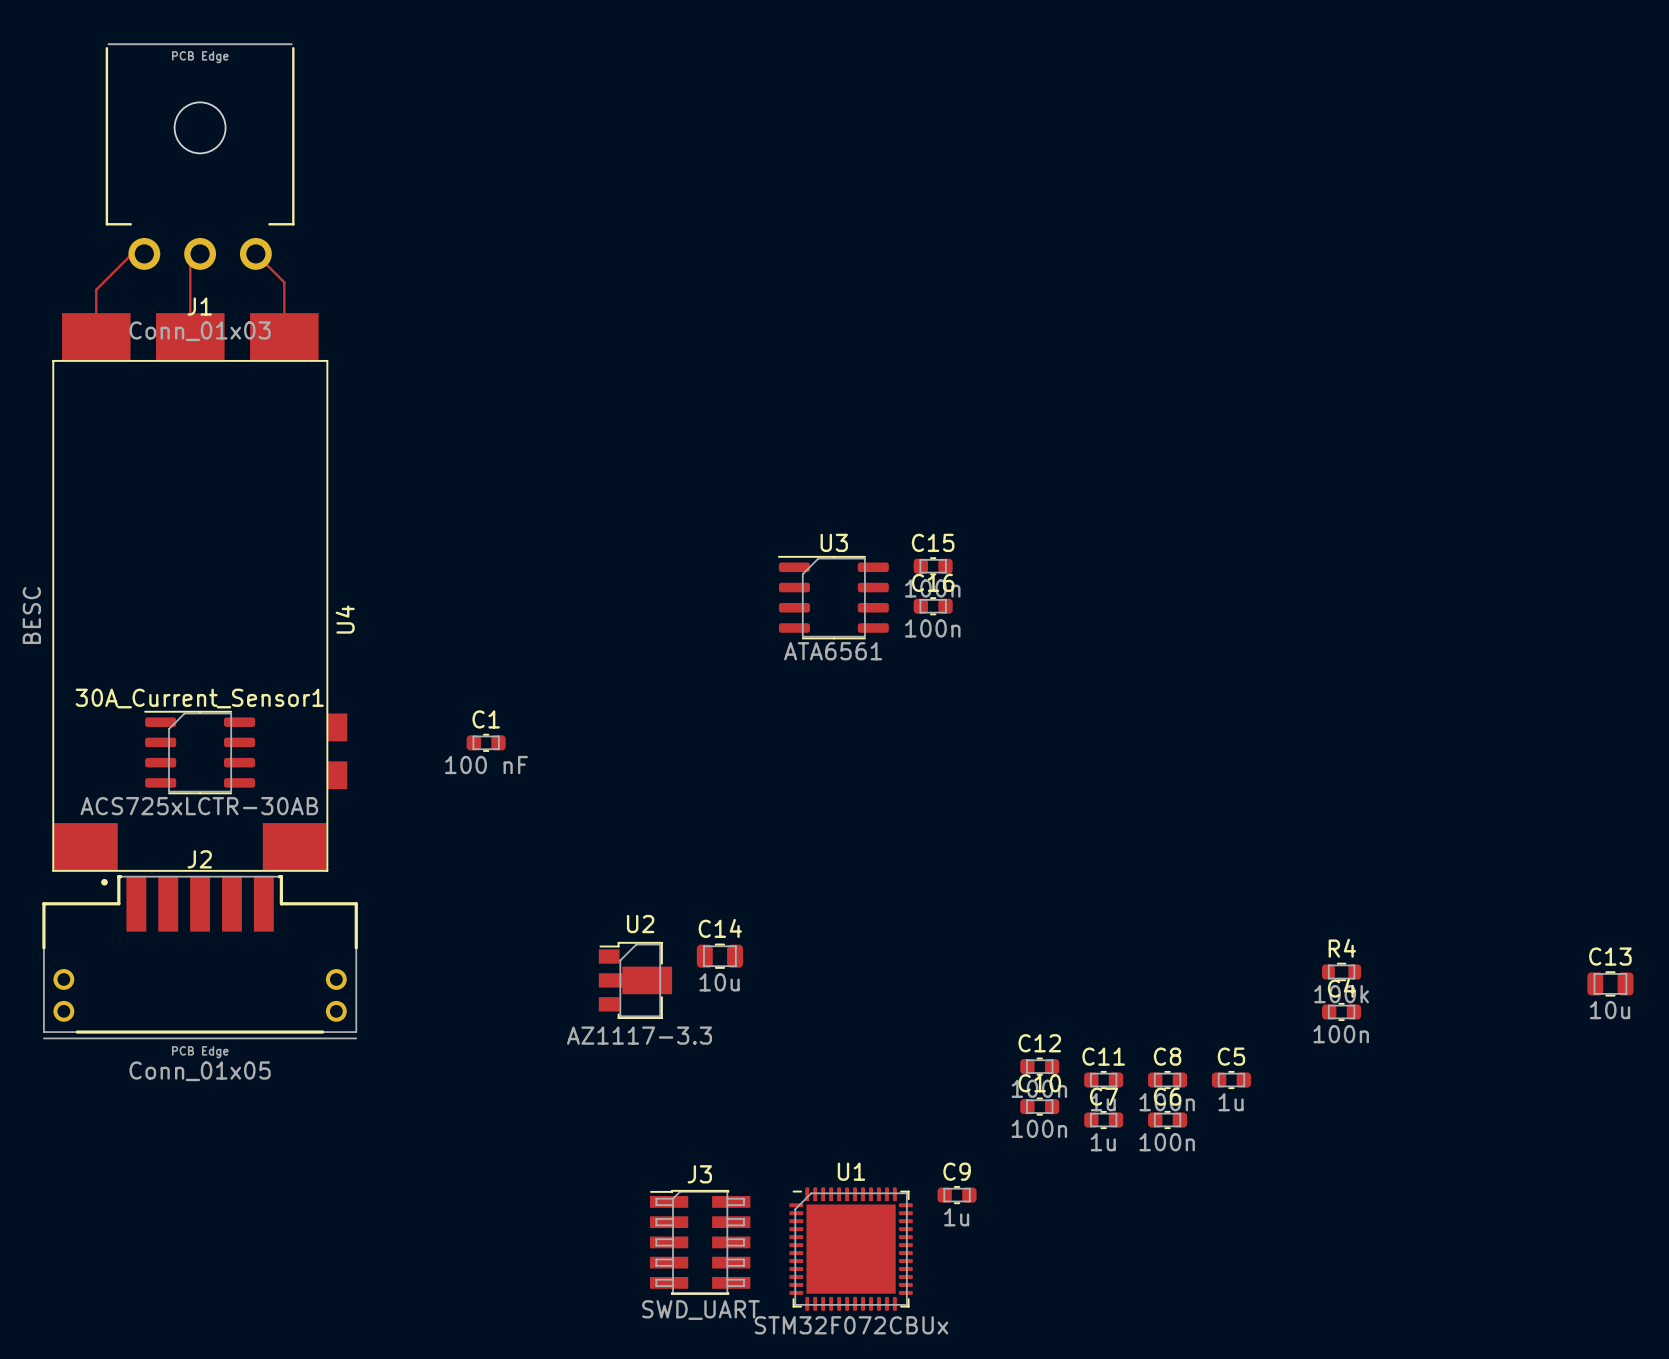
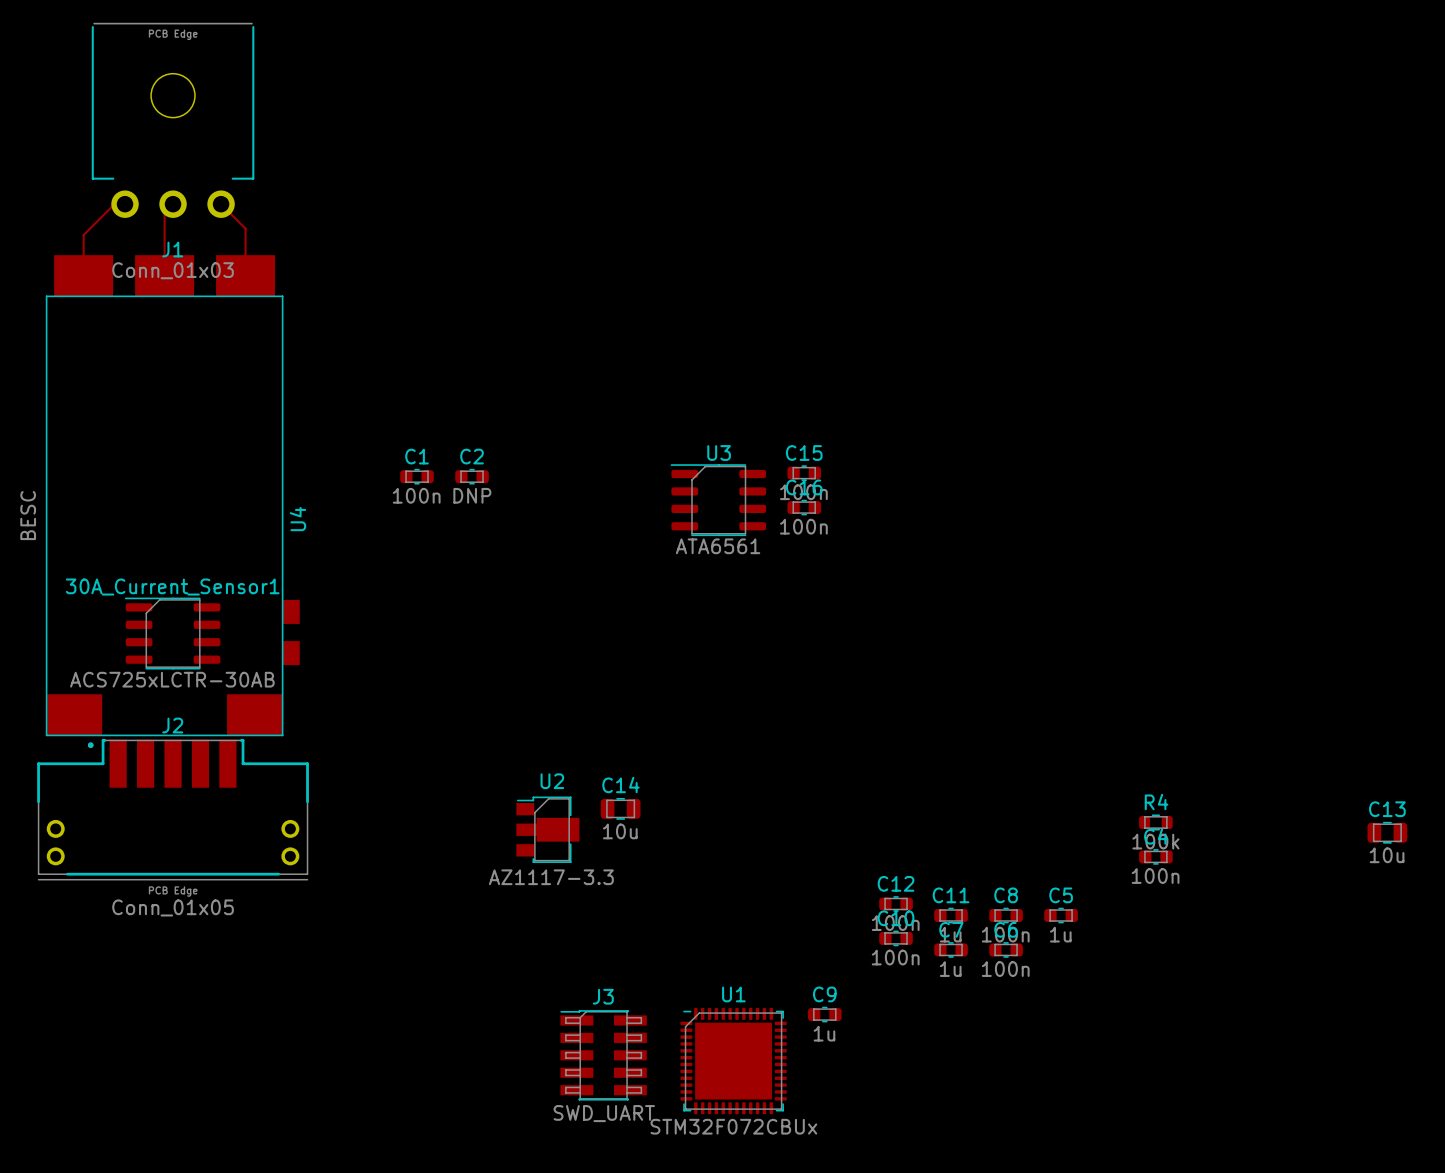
C2: none -> DNP (472, 476)
C1 position: (486, 742) -> (417, 476)
C1 value: 100 nF (486, 765) -> 100n (416, 495)

